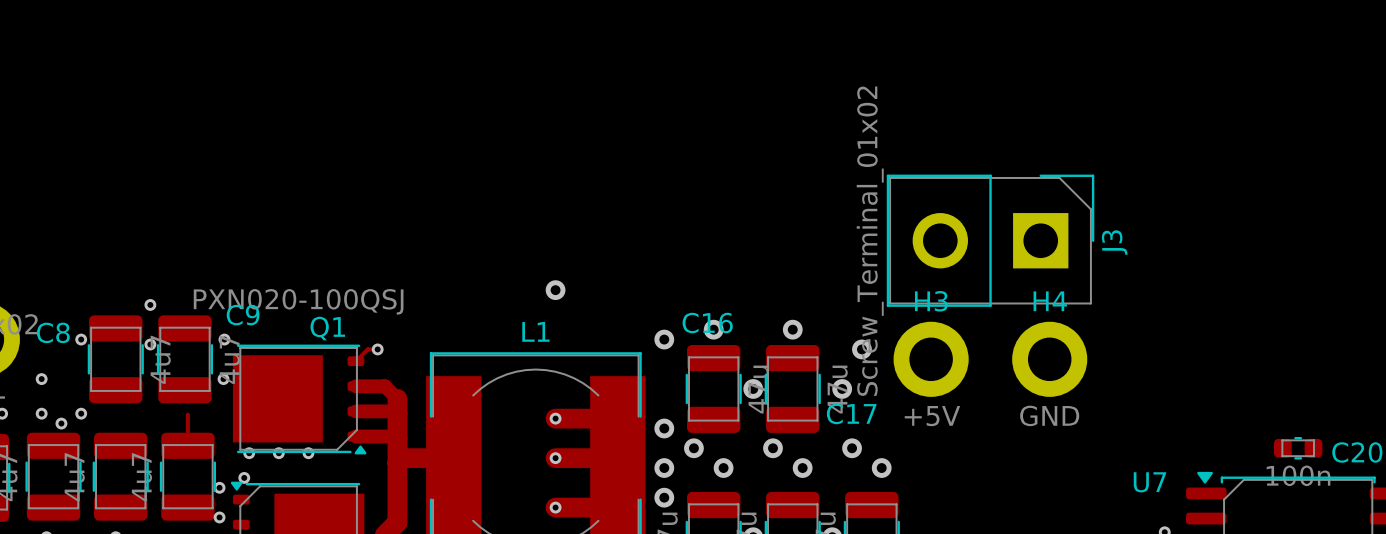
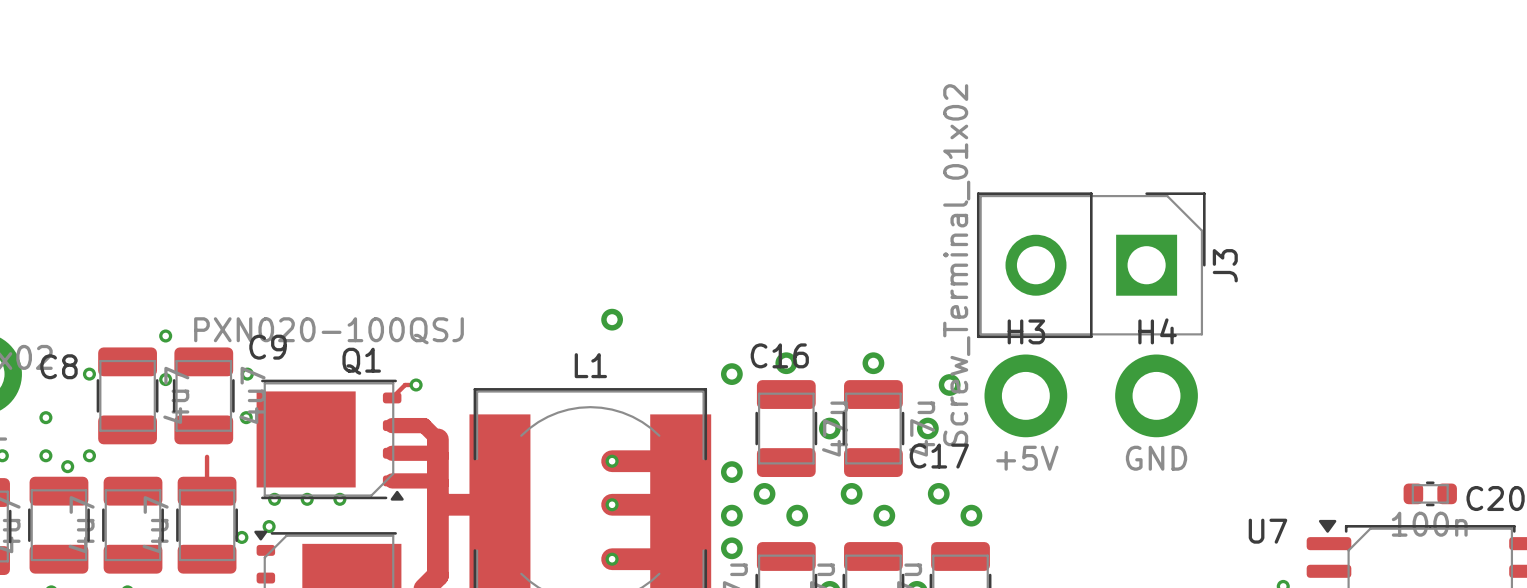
via: (219, 517) -> none

